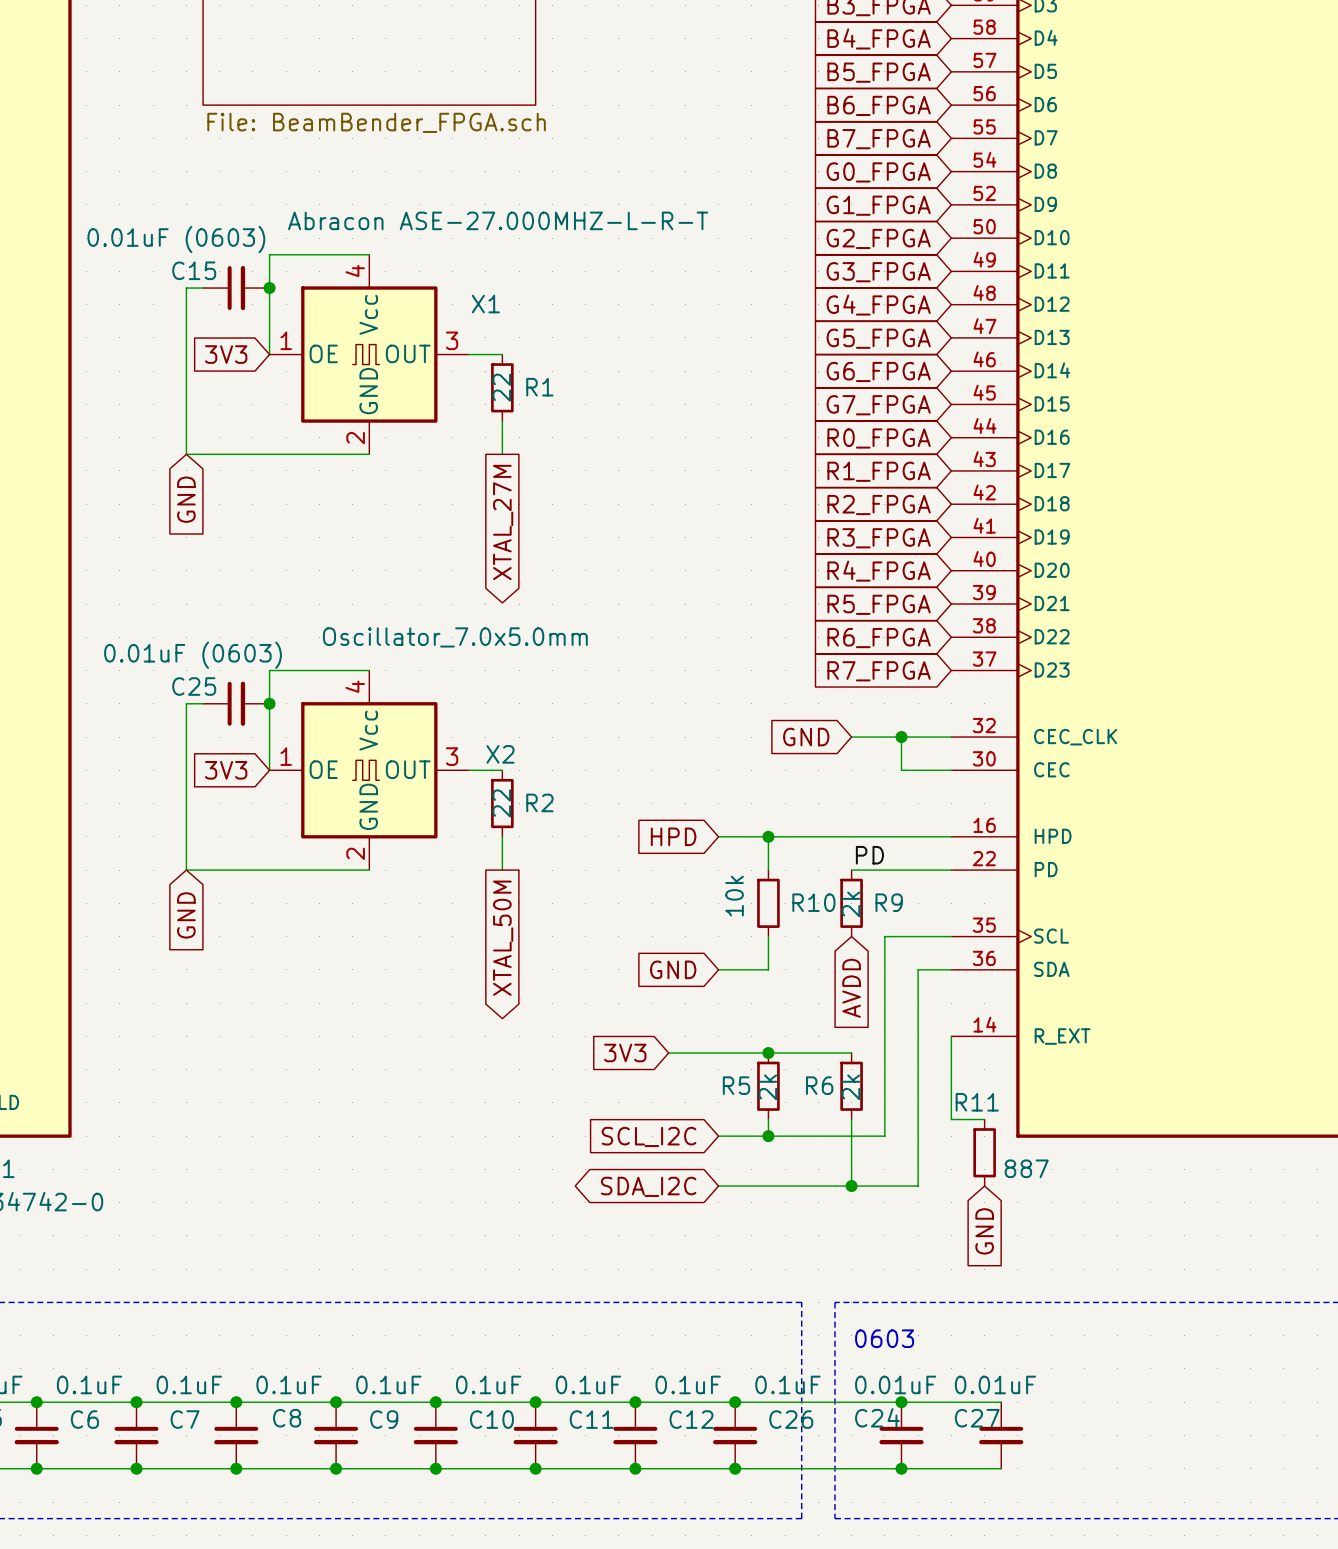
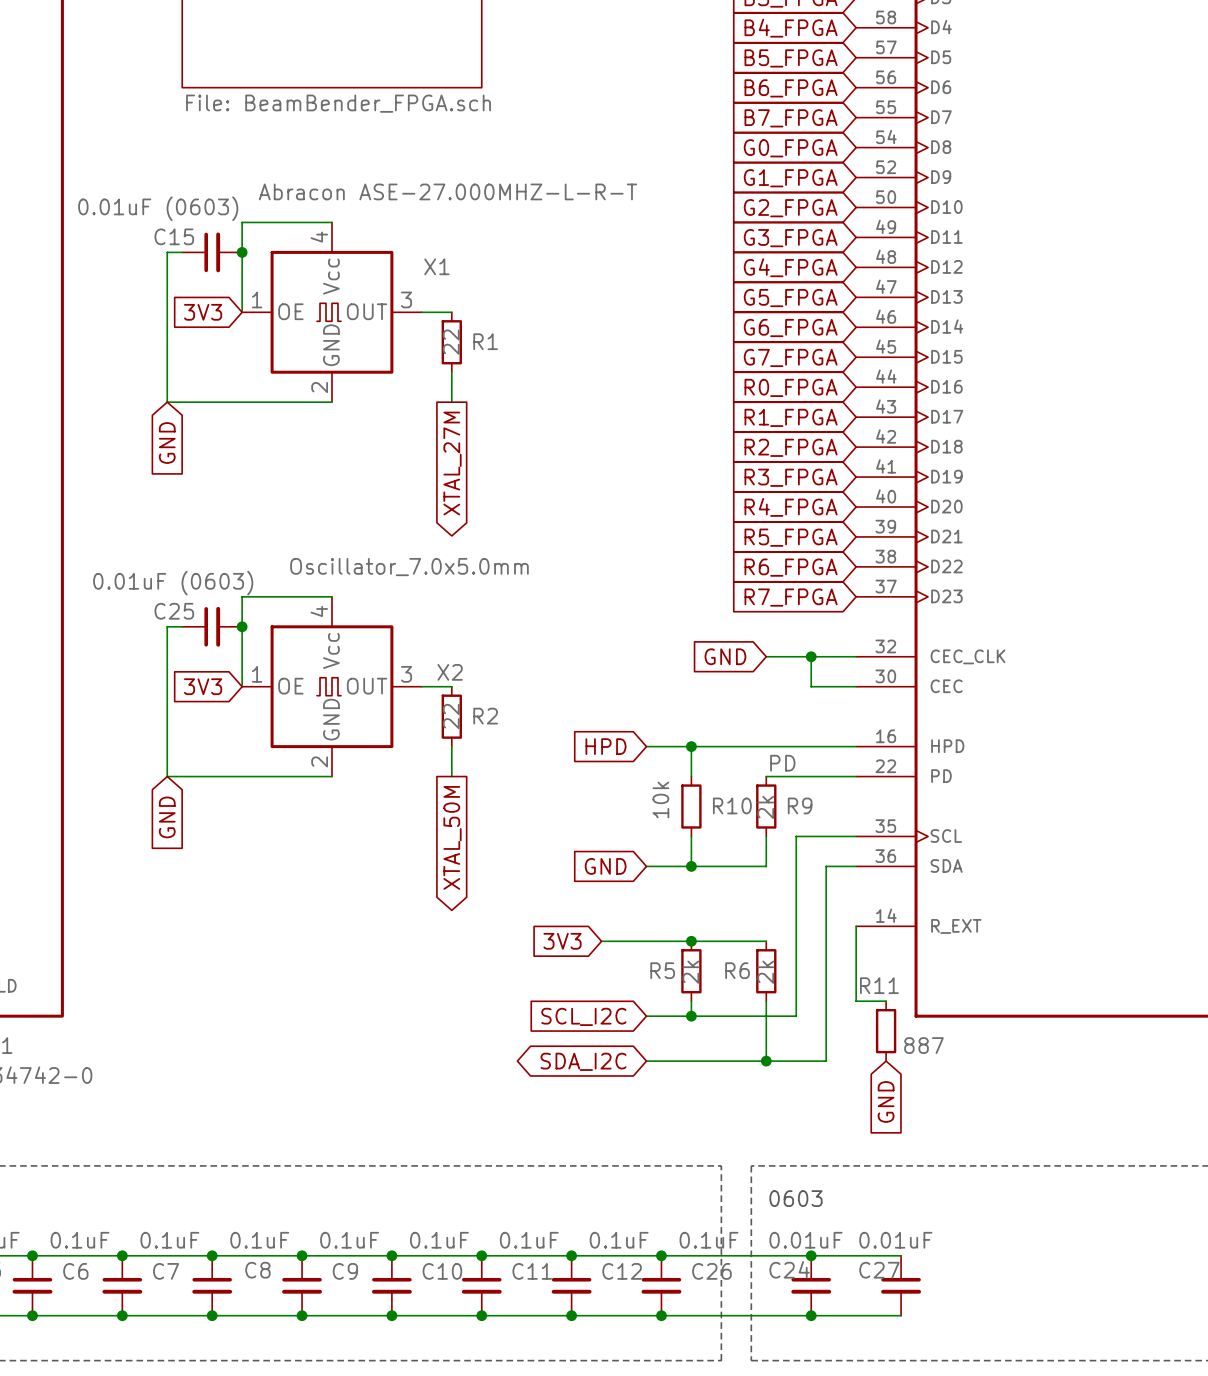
wire: none -> (766, 836) (766, 866) (691, 866)
junction: none -> (691, 866)
global label: AVDD (851, 988) -> none

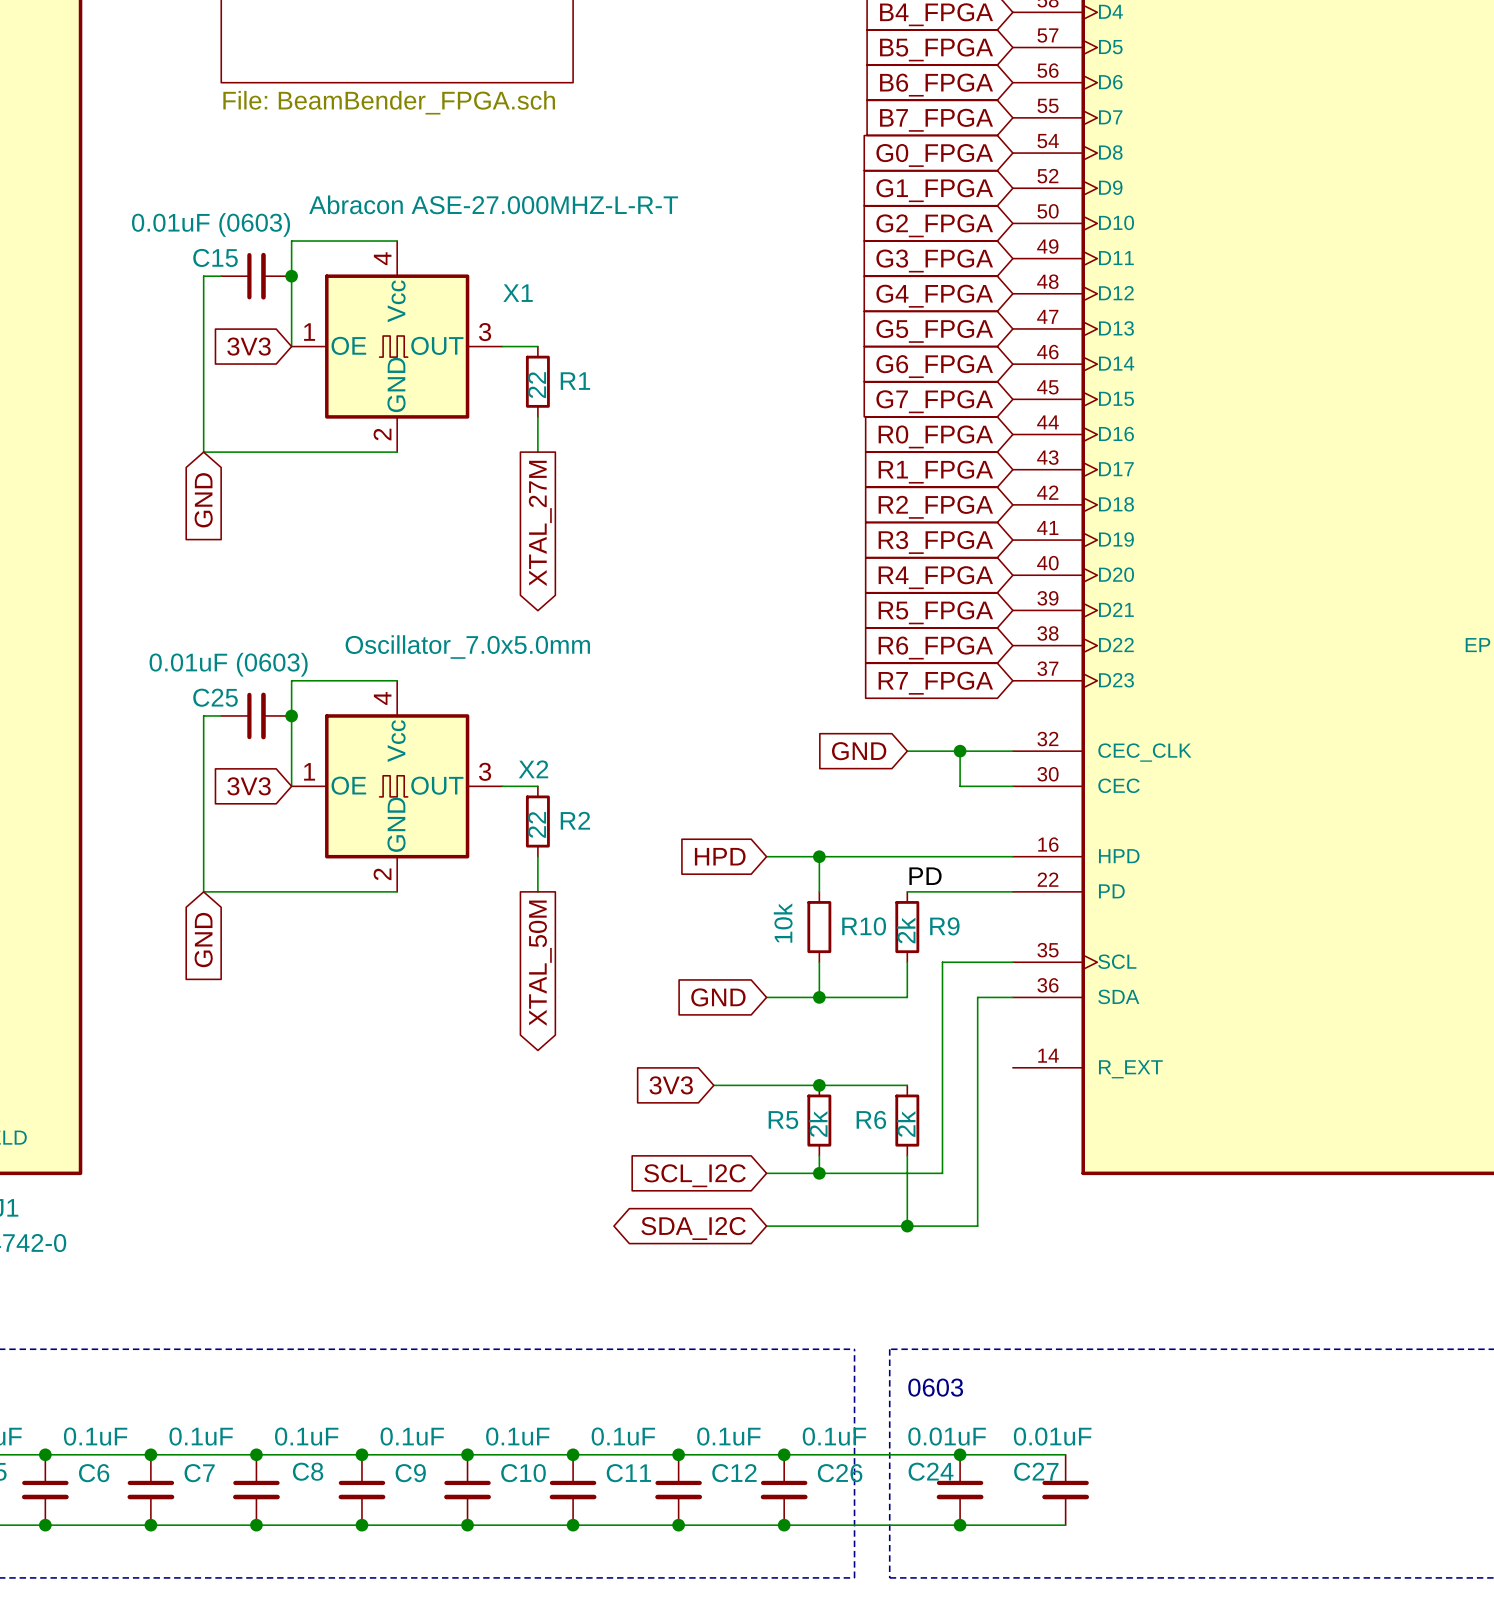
wire: (856, 926) (856, 1001) (886, 1001) -> none
R11: 887 (886, 1031) -> none
global label: GND (886, 1101) -> none

